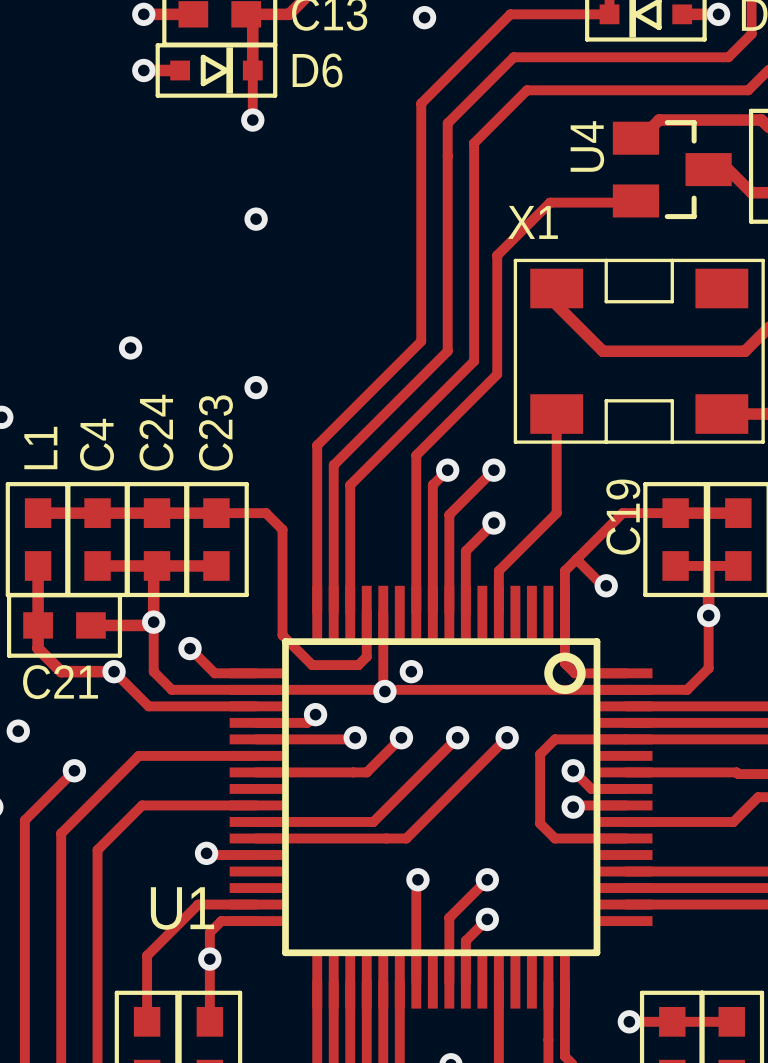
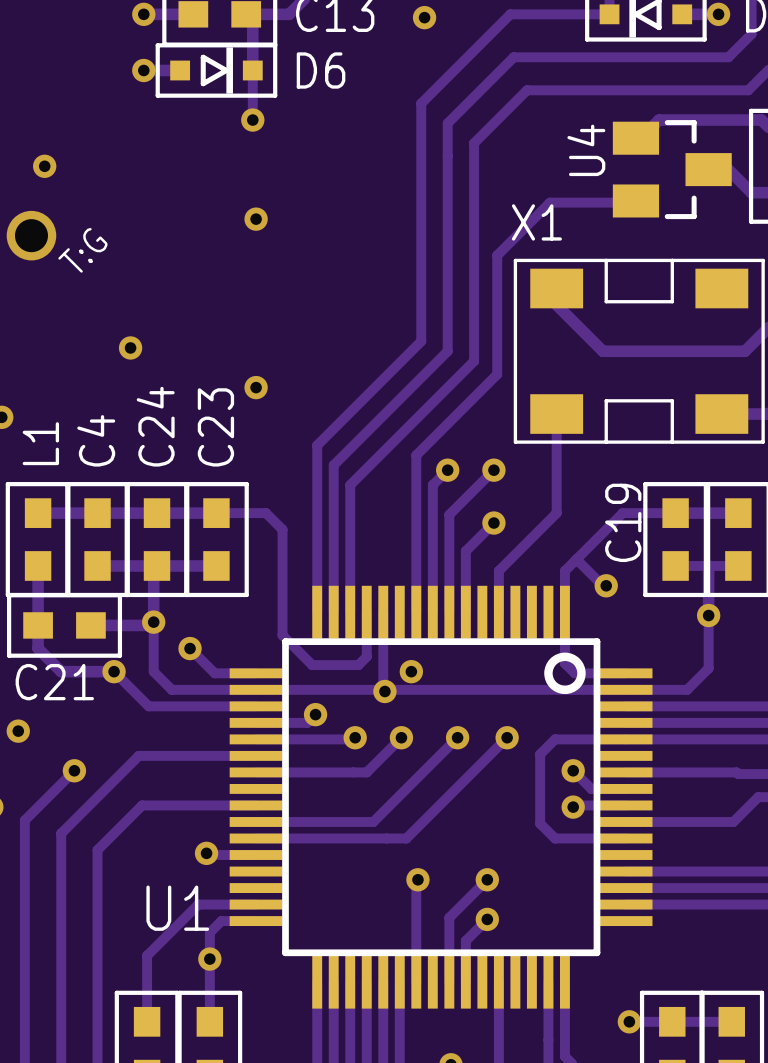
via: none -> (44, 166)
via: none -> (31, 235)
text: none -> T:G (82, 250)

